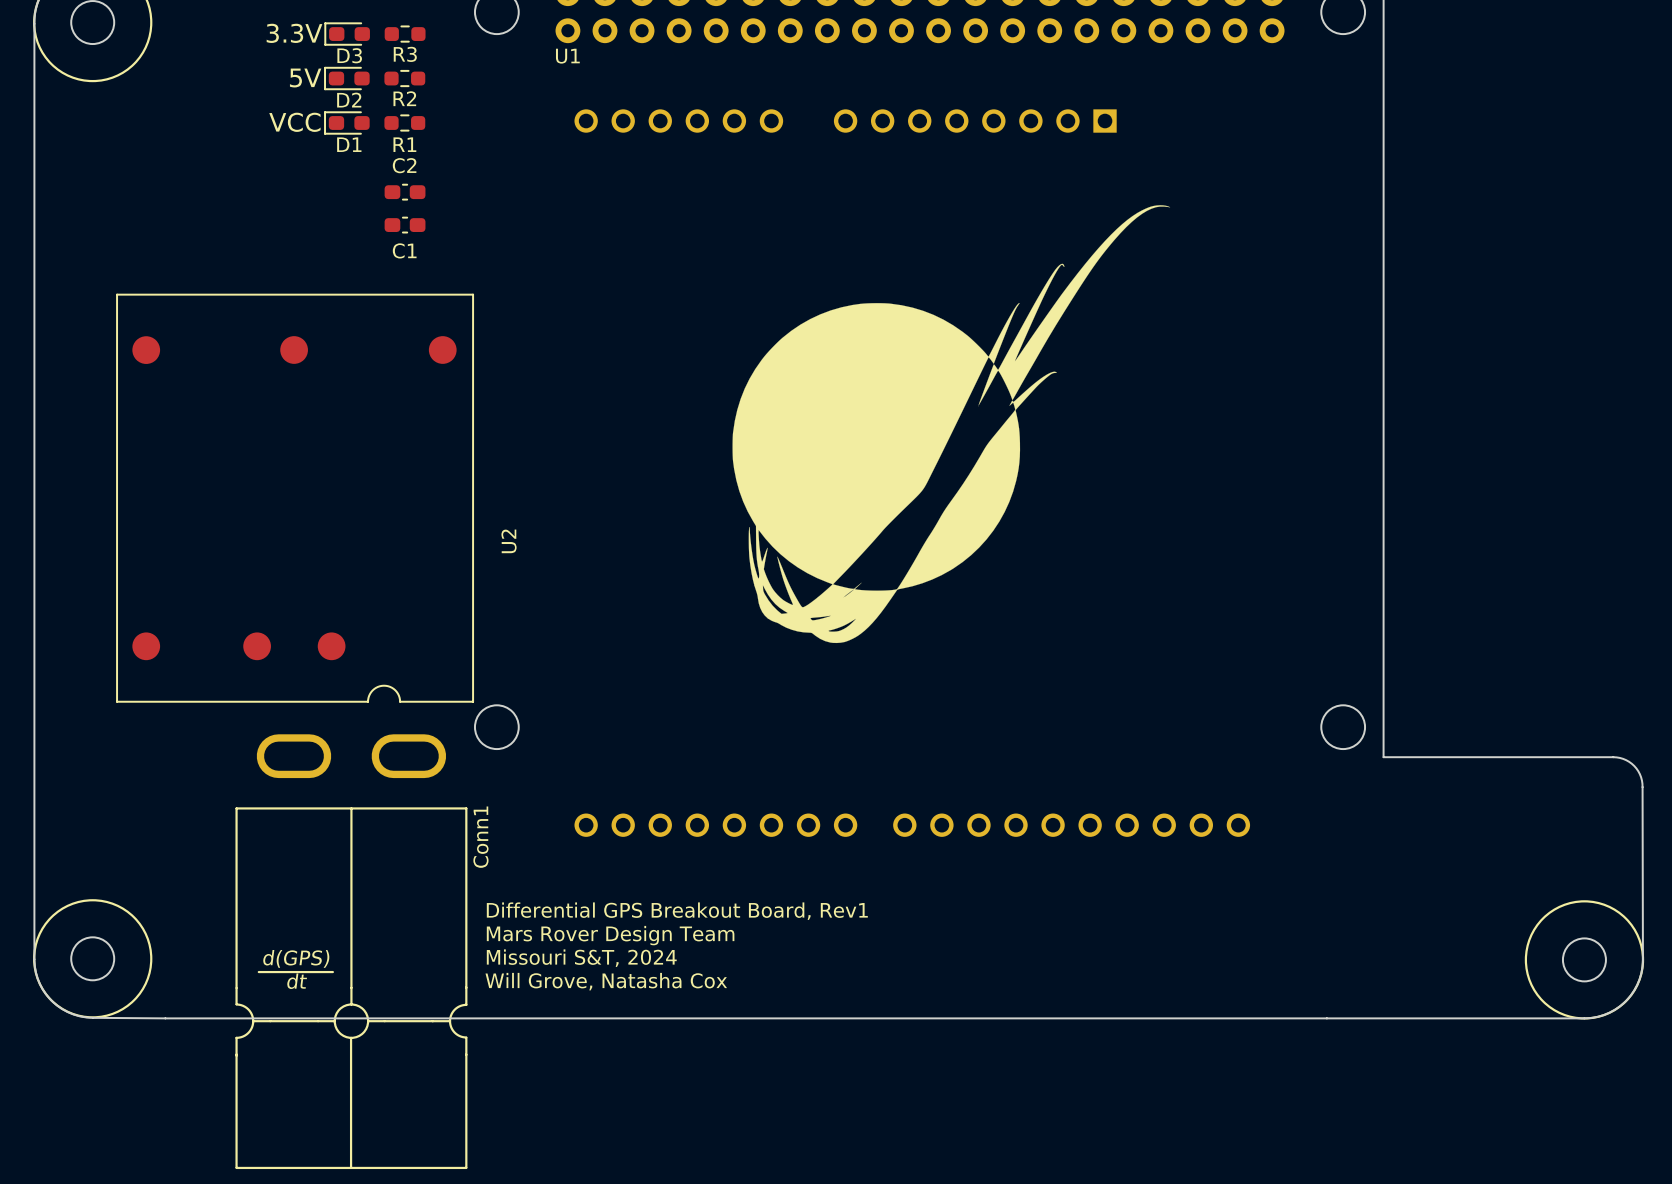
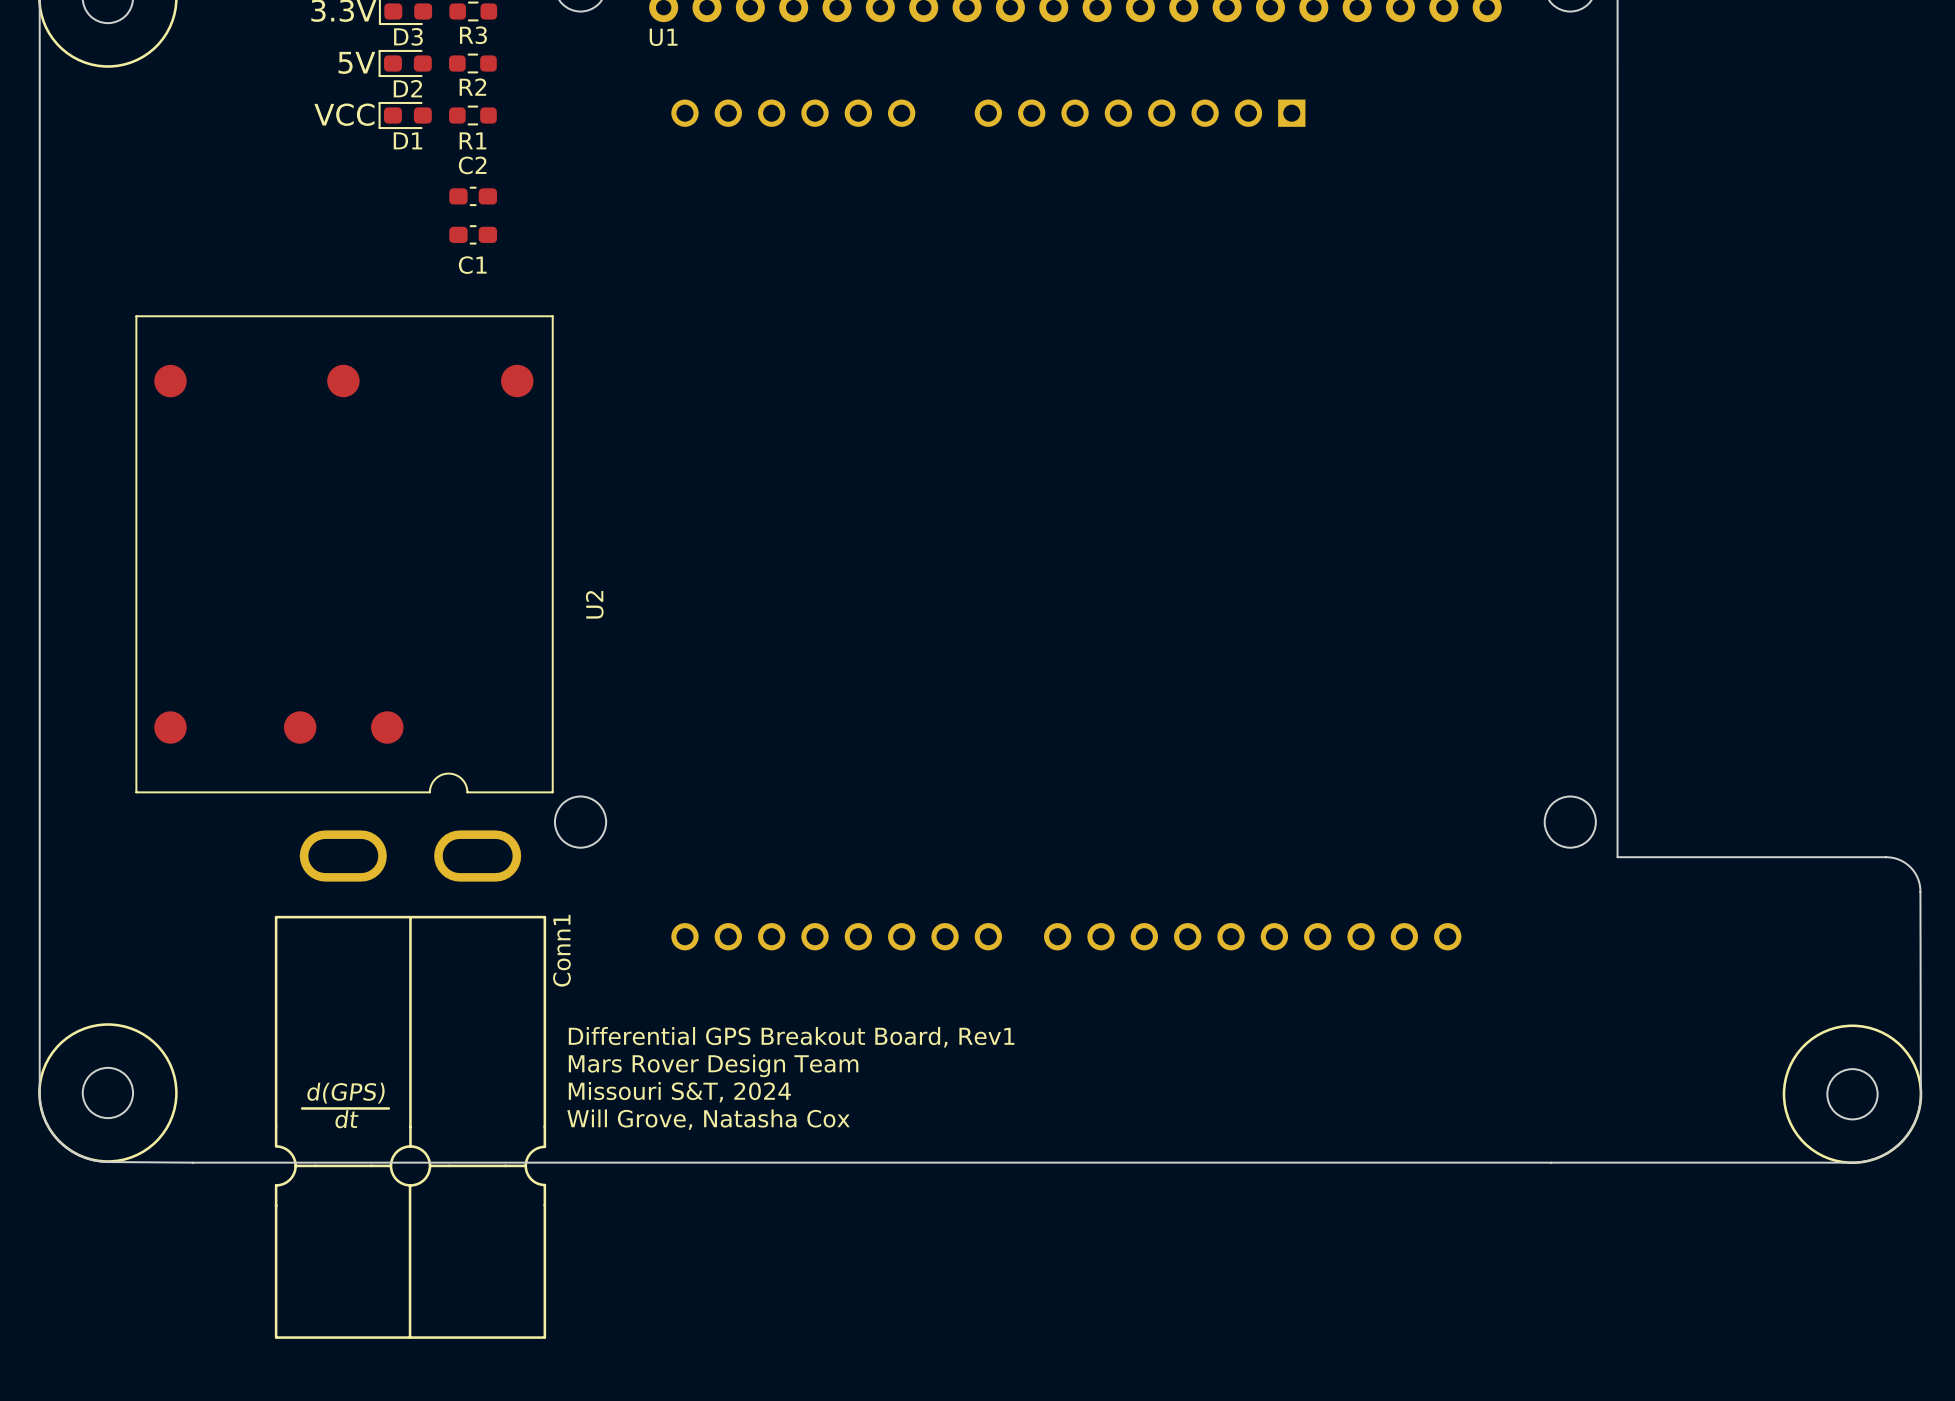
drawing: [732, 205, 1171, 644] -> none

